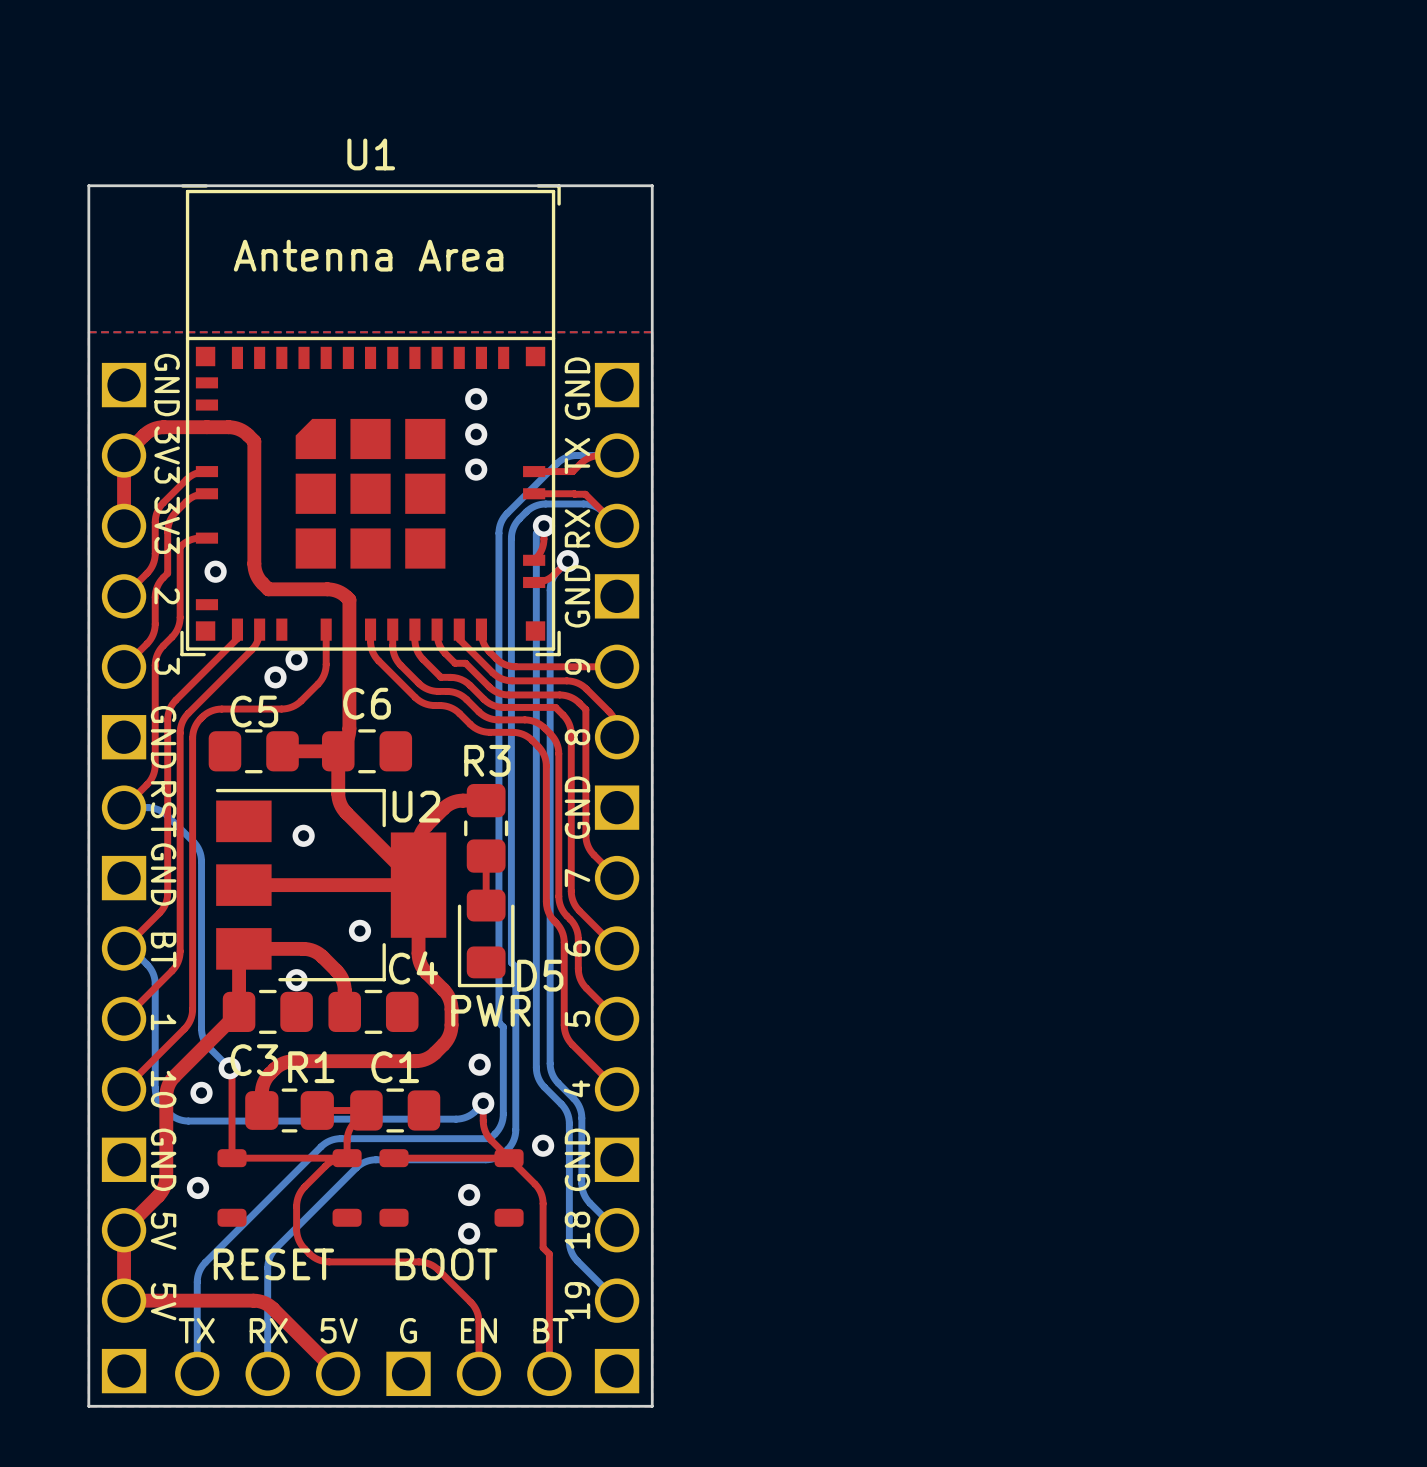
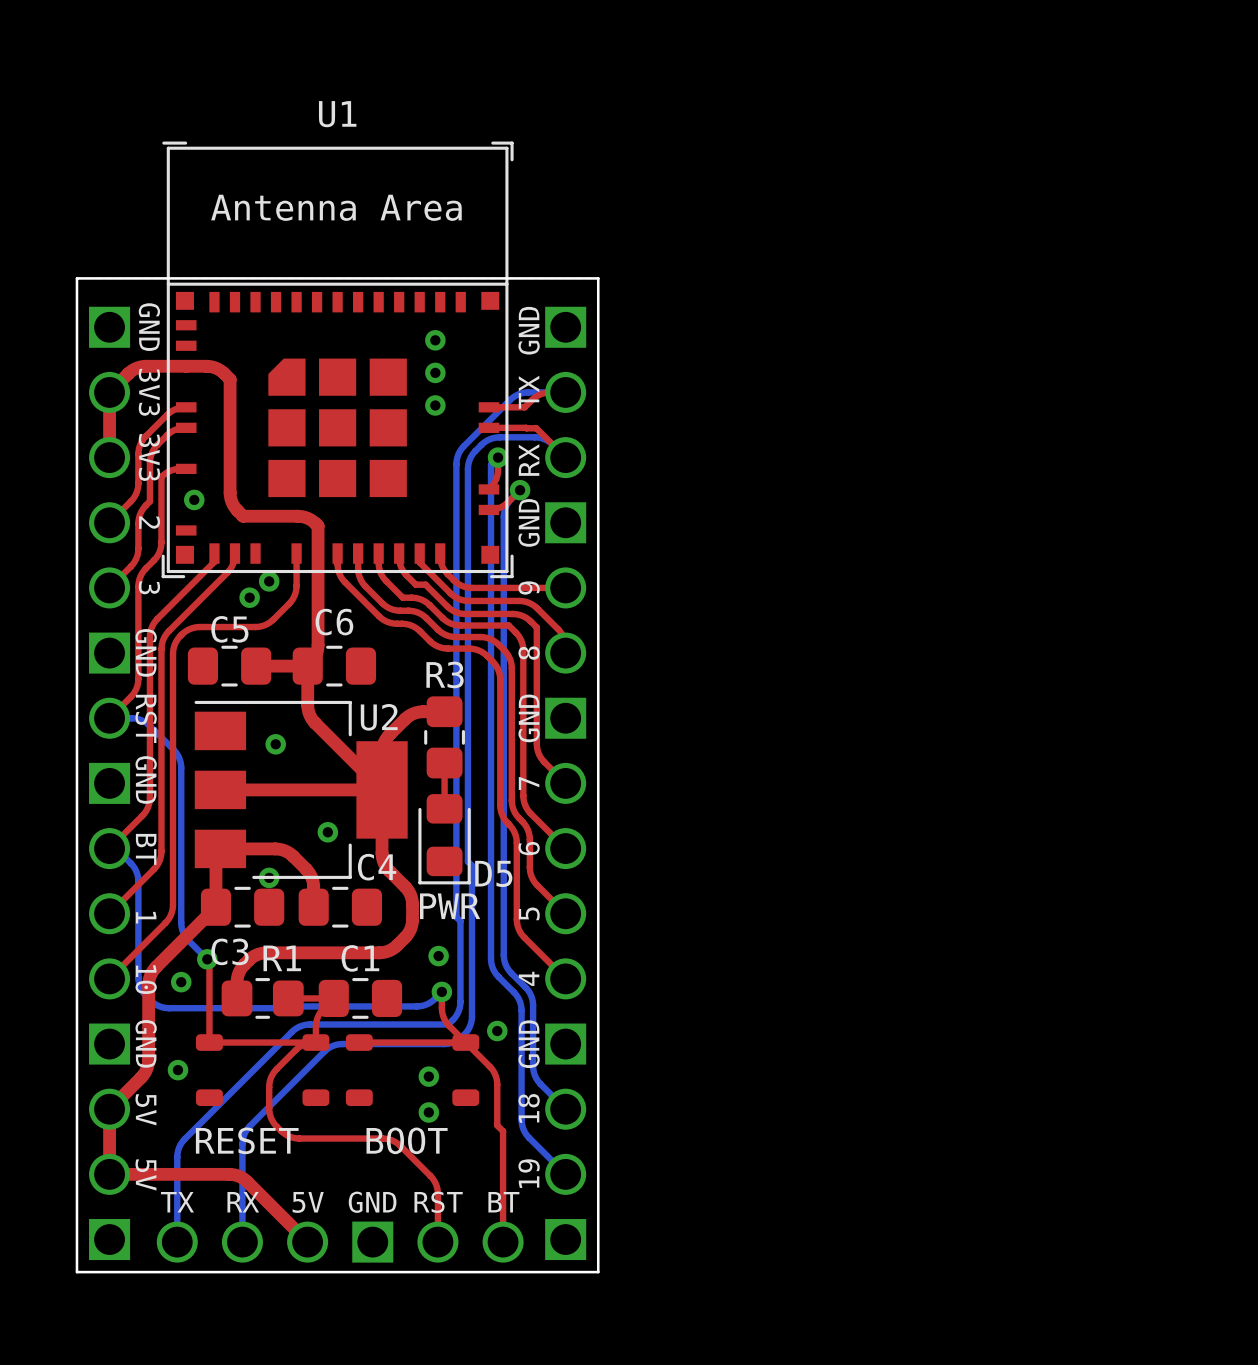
board edge: (88, 332) (88, 185) (652, 185) (652, 332) -> (76, 278) (598, 278)
part text: G (408, 1330) -> GND (372, 1202)
part text: EN (478, 1330) -> RST (438, 1202)

